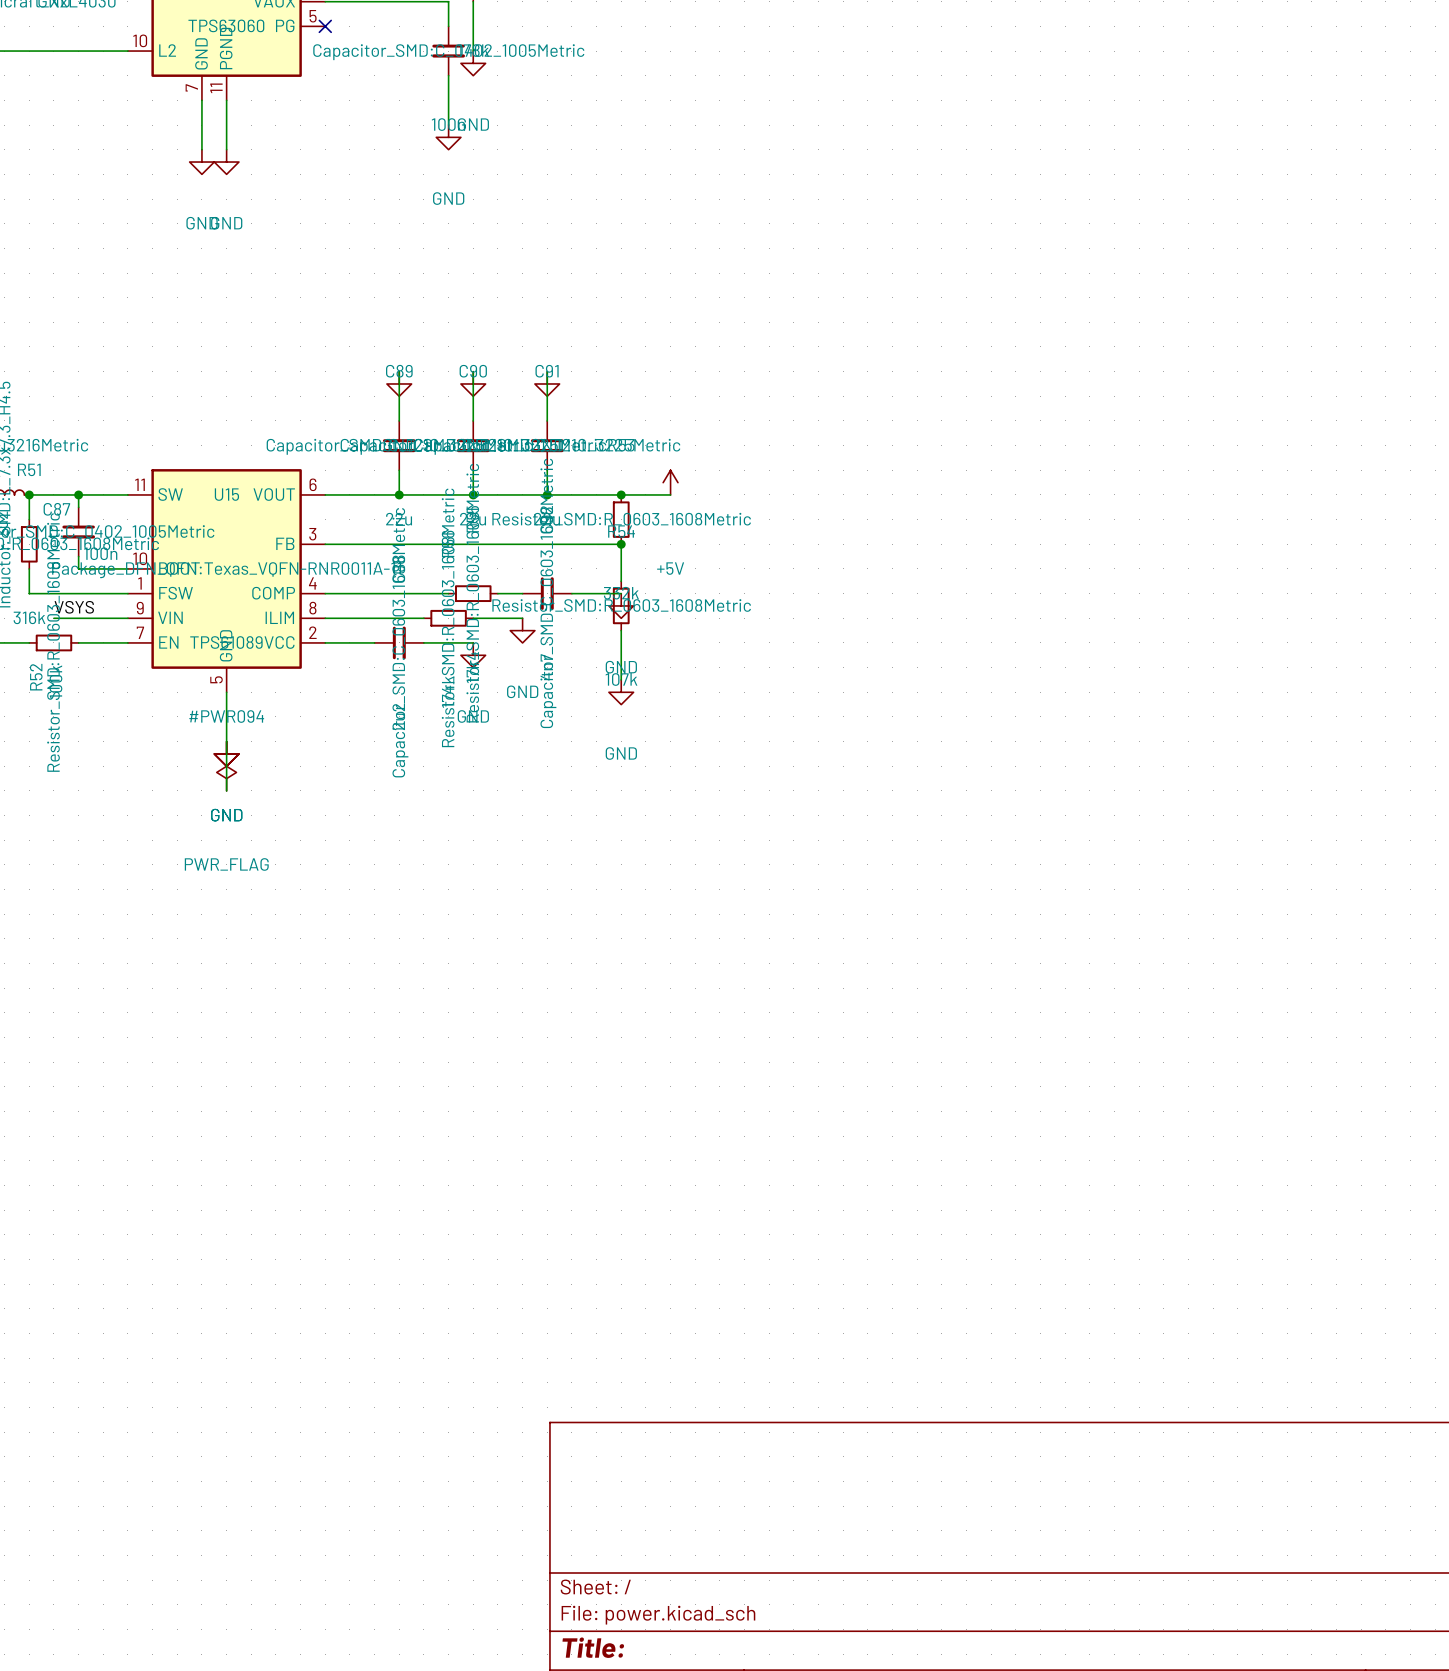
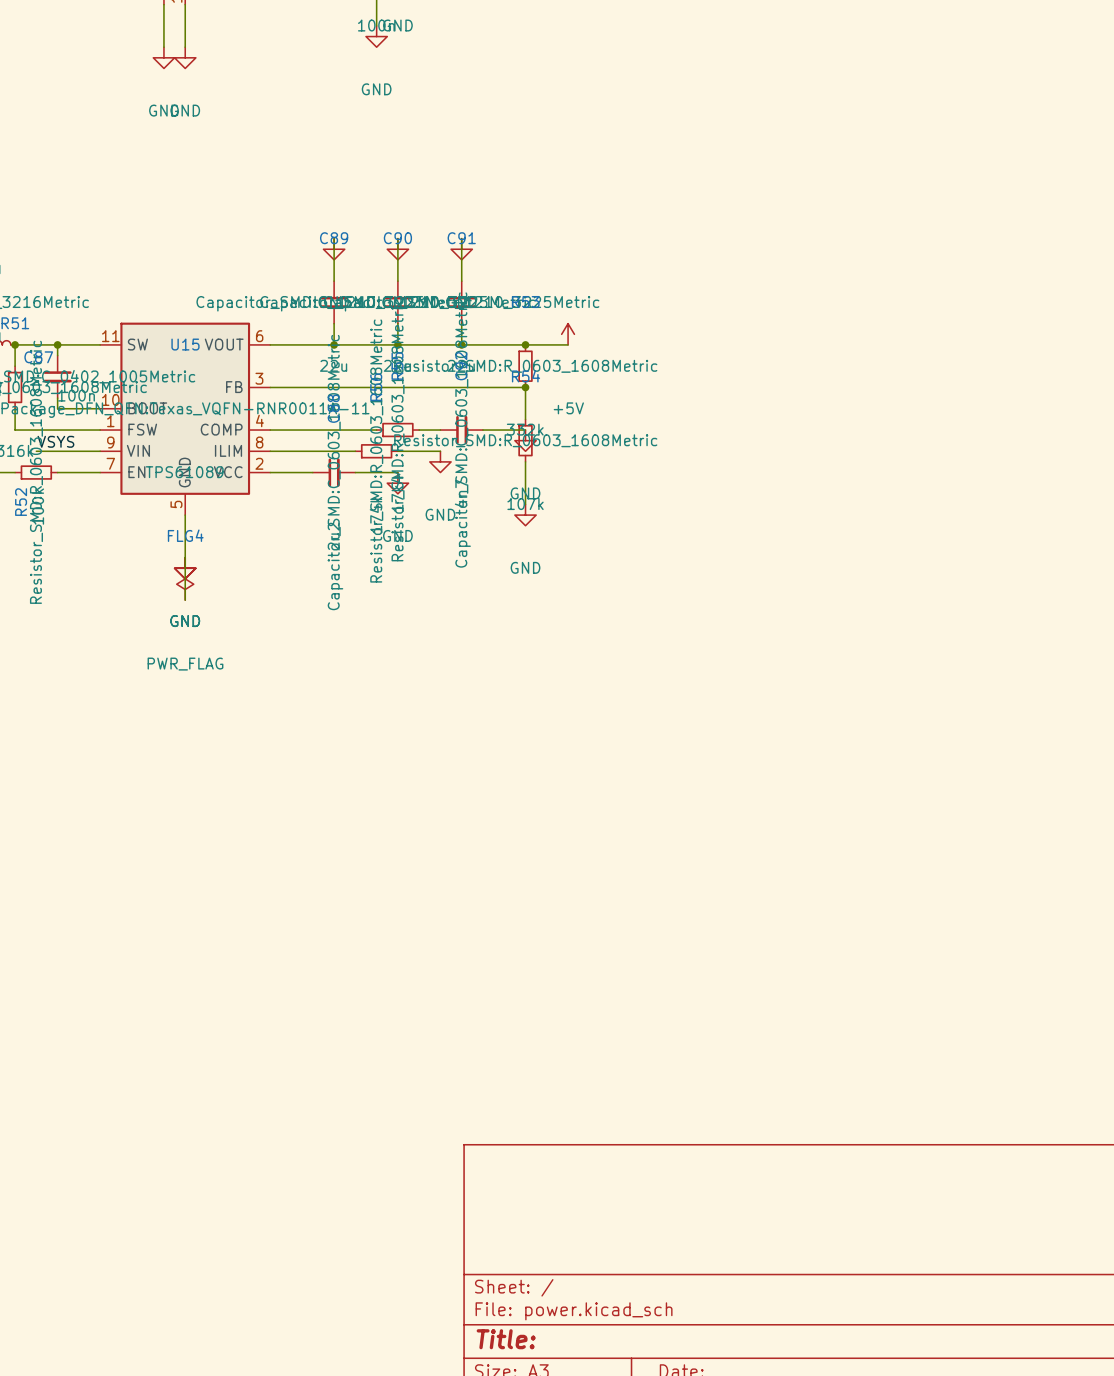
#PWR094 name: #PWR094 (226, 716) -> FLG4 (185, 535)

